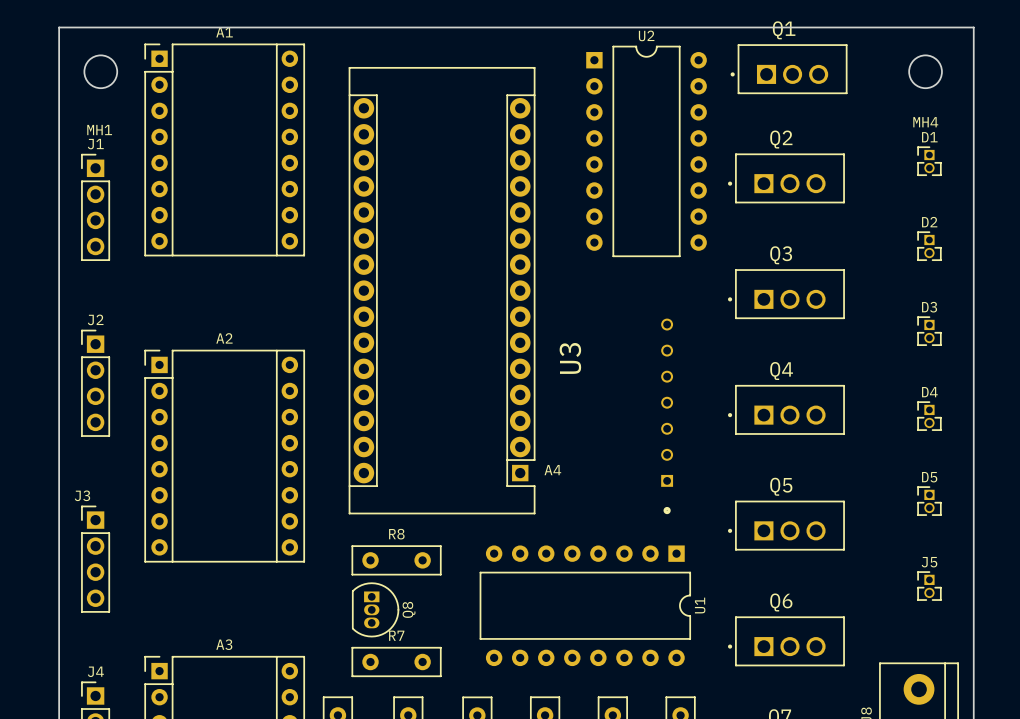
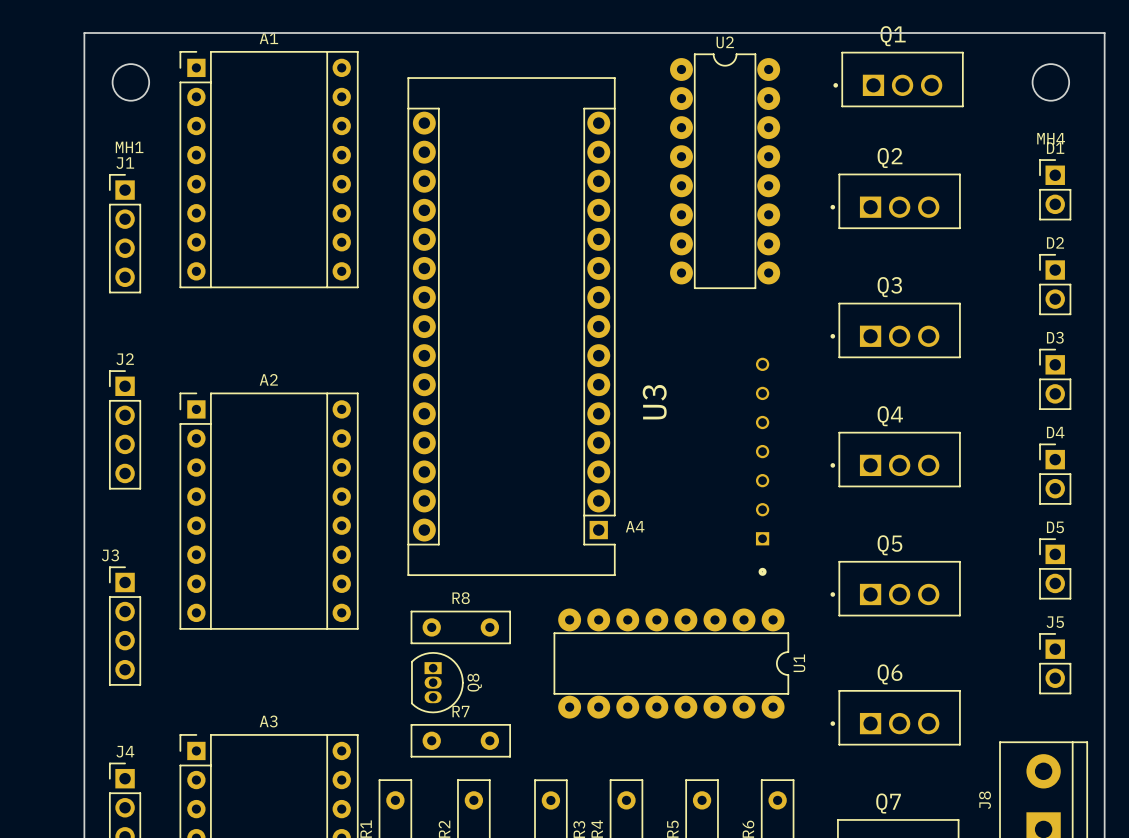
U2 footprint: [586, 45, 707, 257] -> [670, 53, 781, 289]
D1 footprint: [917, 146, 942, 176] -> [1039, 159, 1072, 221]
D2 footprint: [917, 231, 942, 261] -> [1039, 254, 1072, 316]
D3 footprint: [917, 316, 942, 346] -> [1039, 348, 1072, 410]
D4 footprint: [917, 401, 942, 431] -> [1039, 443, 1072, 505]
D5 footprint: [917, 486, 942, 516] -> [1039, 538, 1072, 600]
U1 footprint: [479, 545, 691, 667] -> [553, 608, 790, 719]
J5 footprint: [917, 571, 942, 601] -> [1039, 633, 1072, 695]

